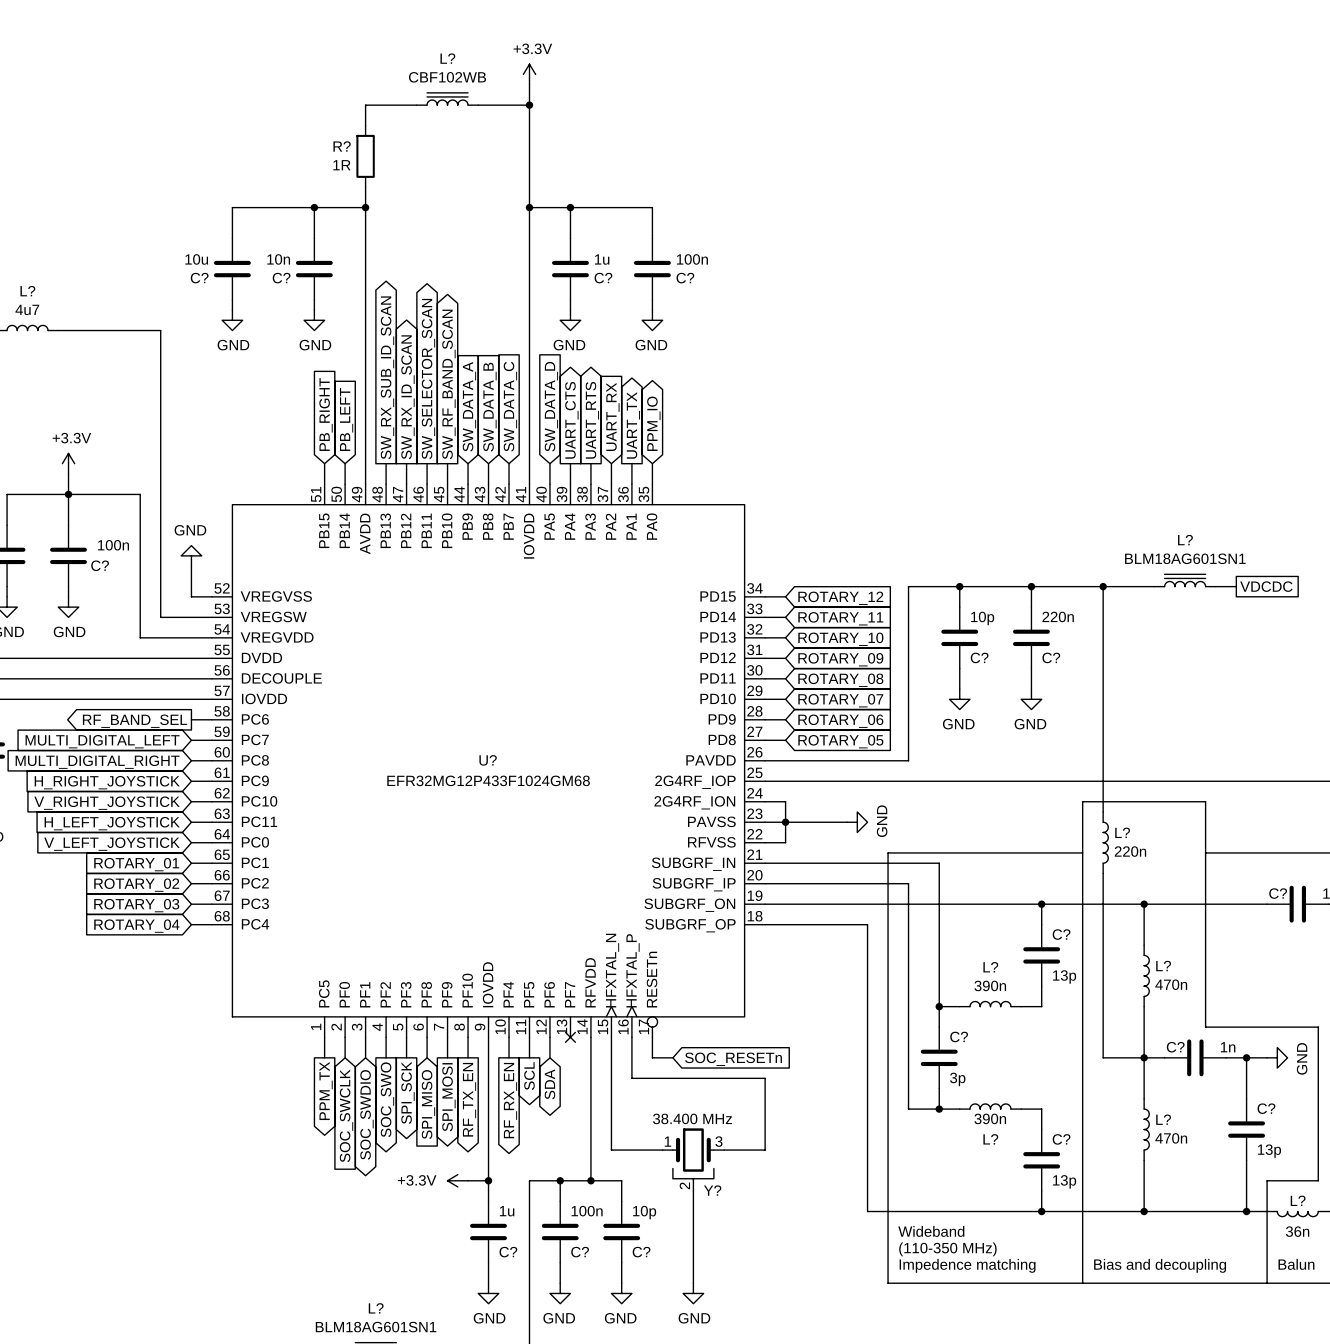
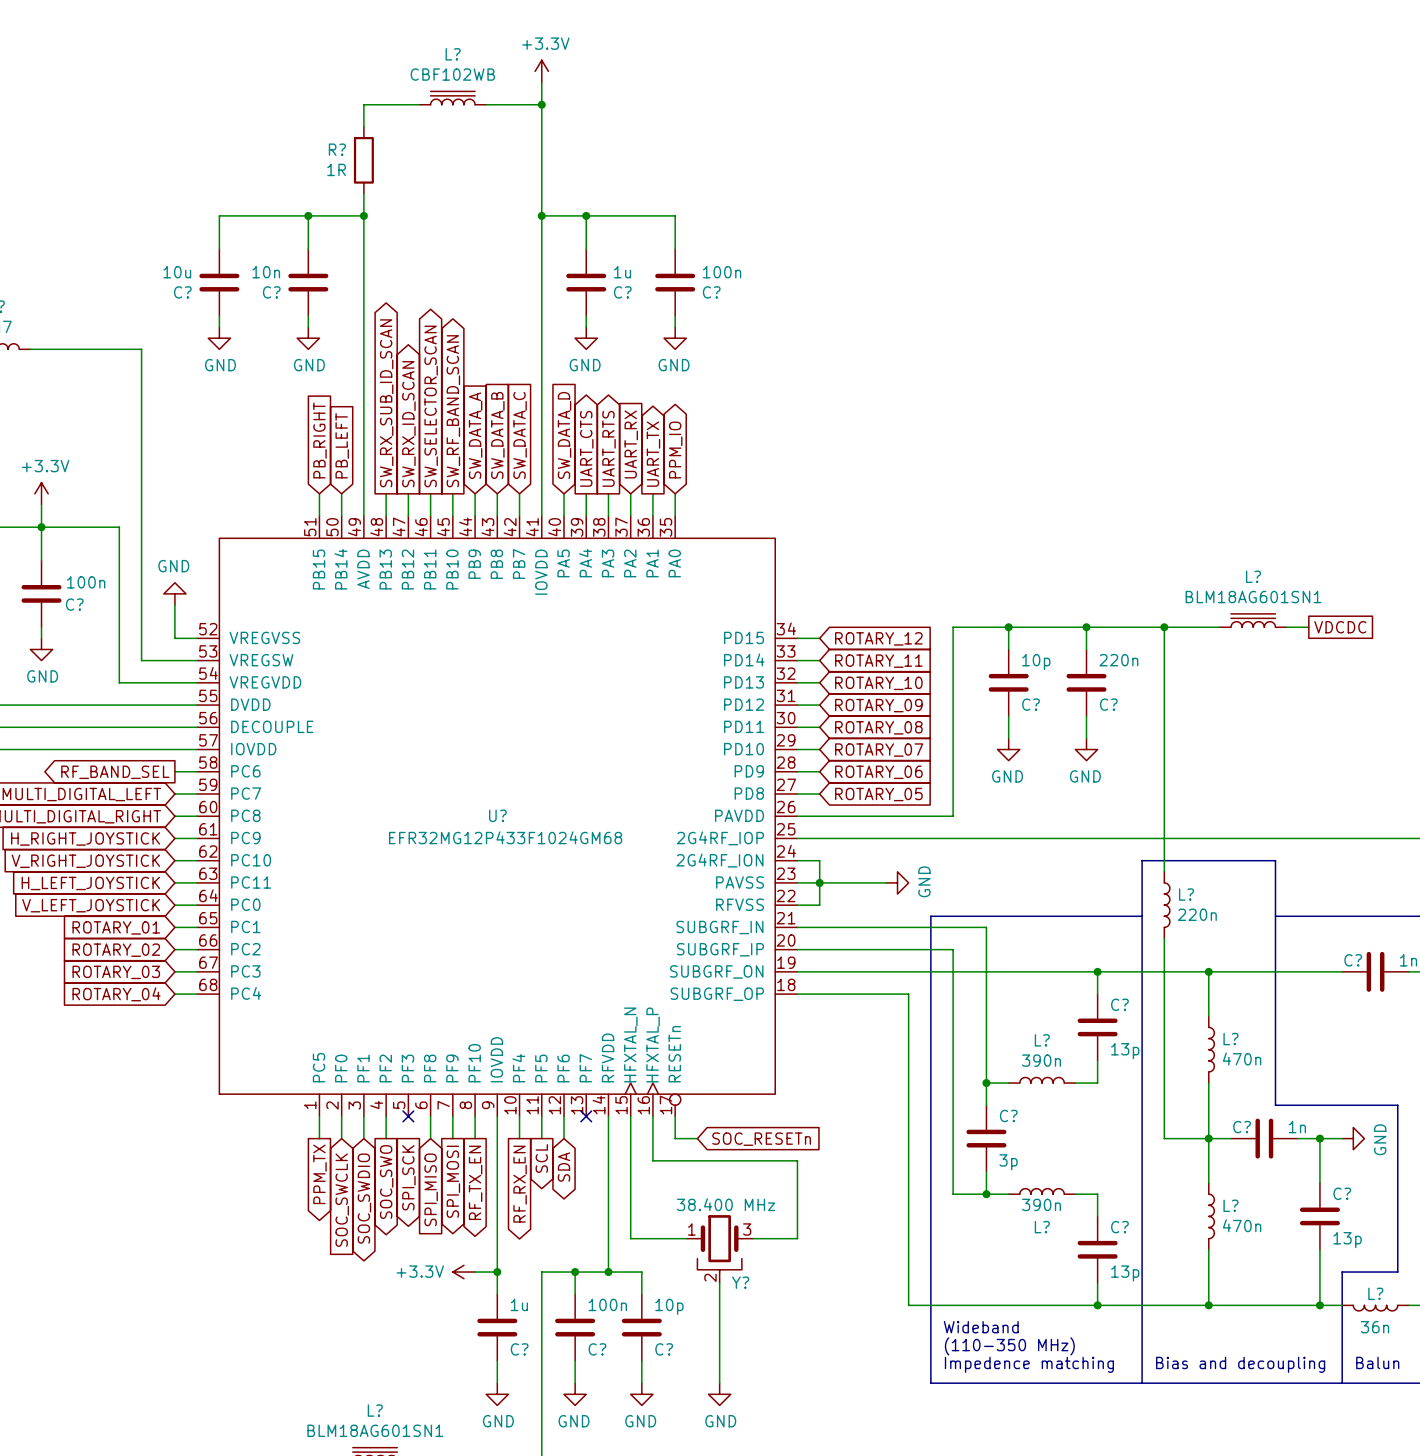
wire: (406, 1037) (406, 1057) -> none
no-connect mark: none -> (408, 1116)

